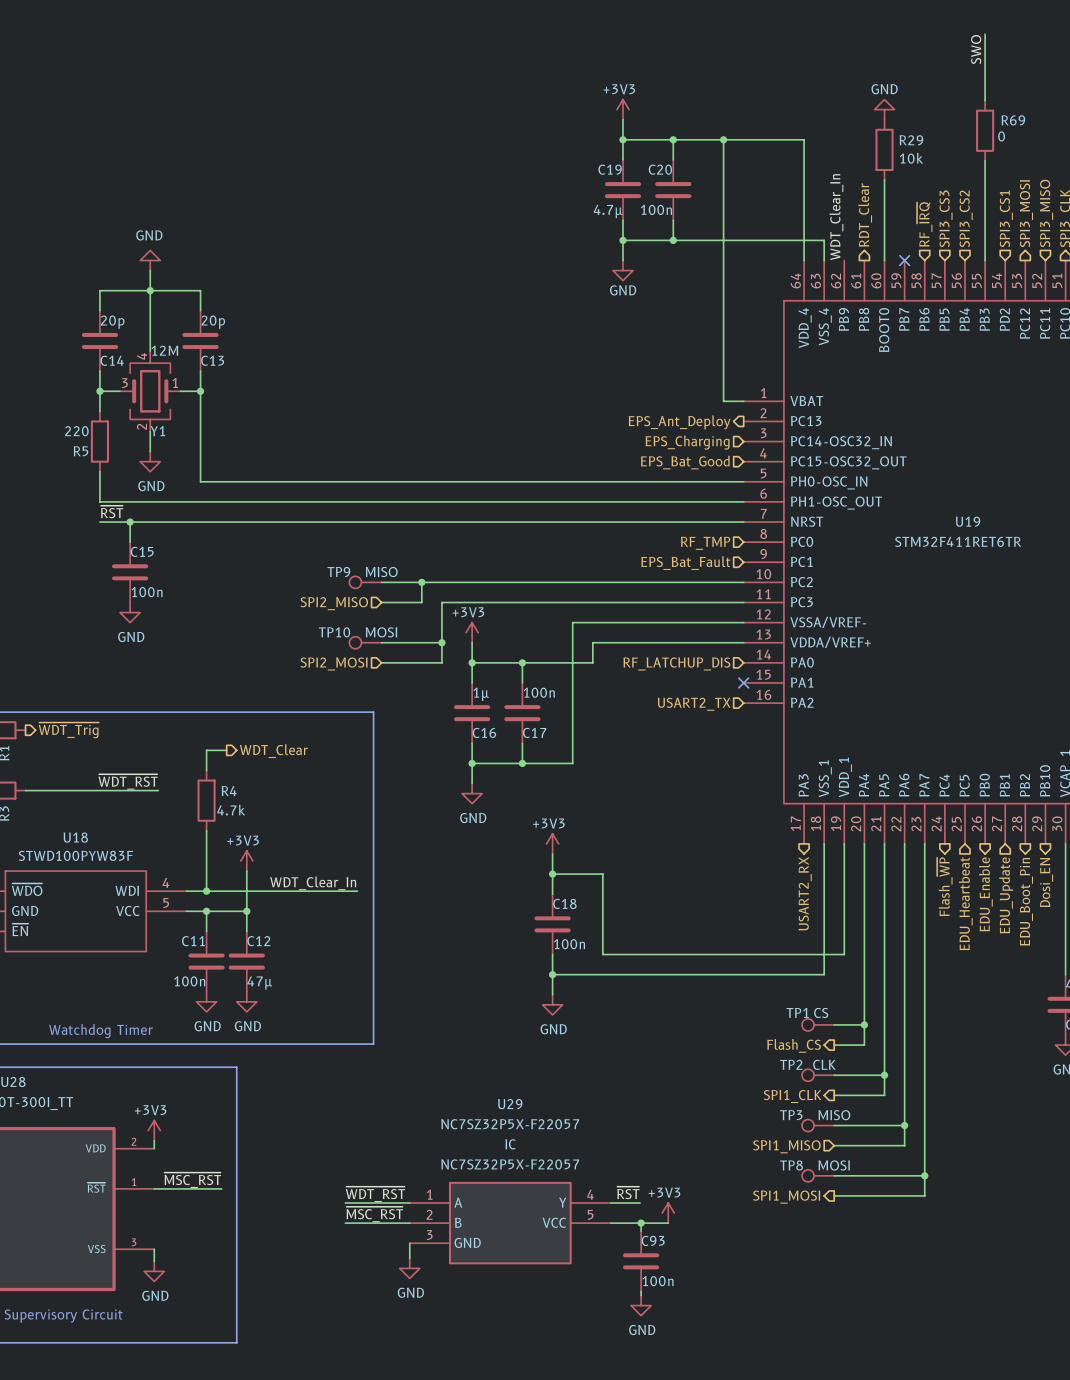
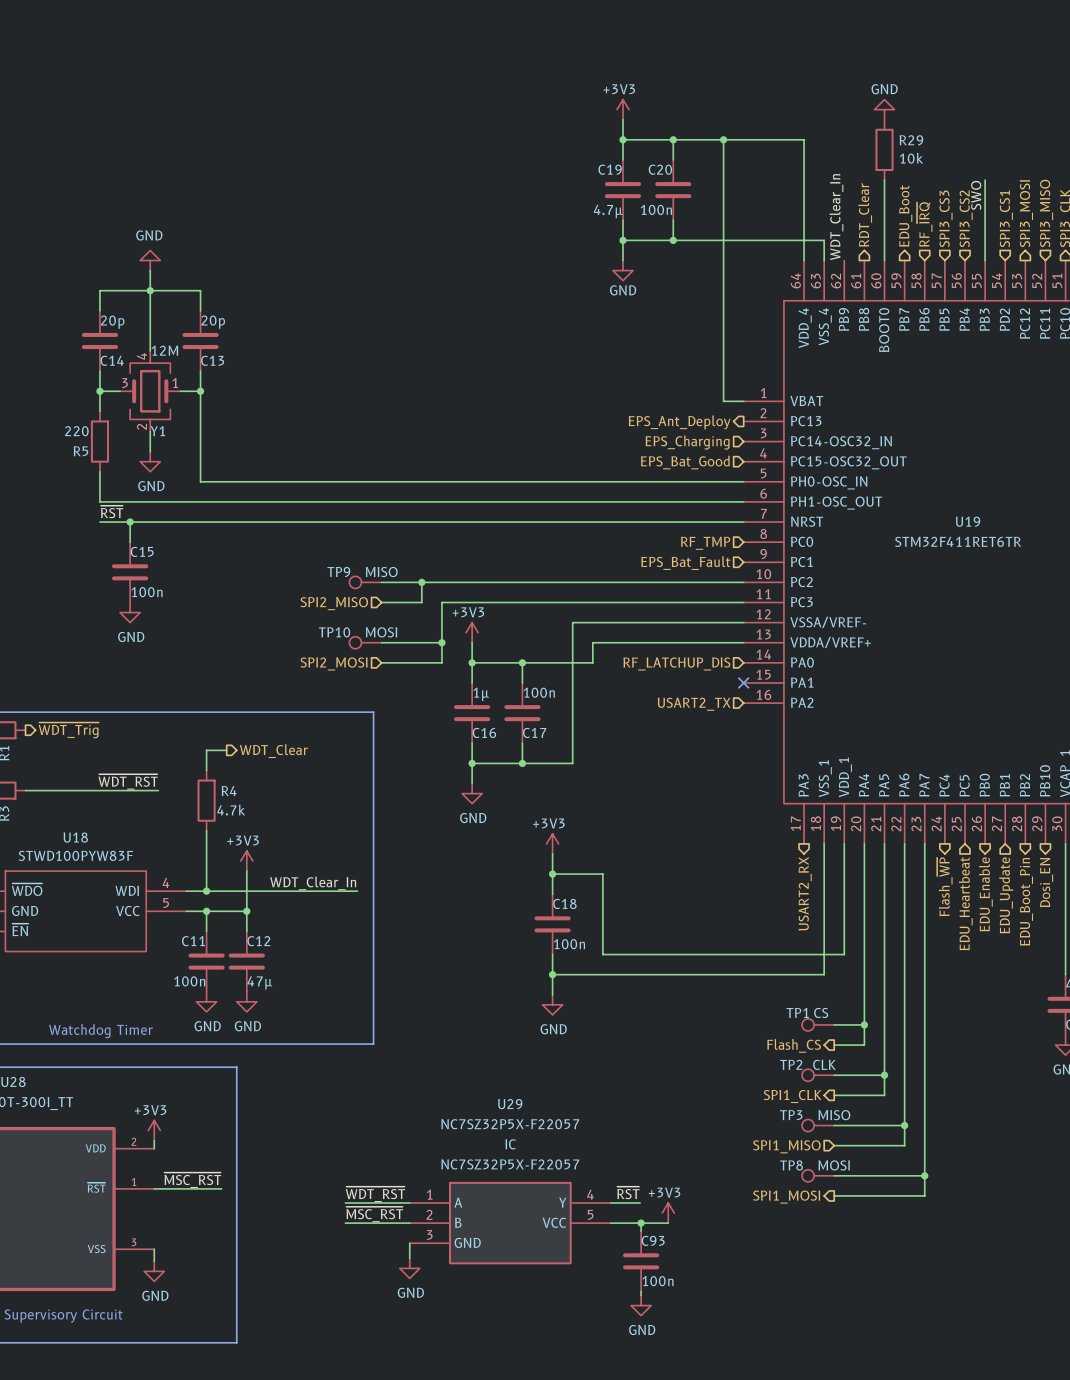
wire: (985, 34) (985, 100) -> none
label position: SWO (976, 49) -> SWO (976, 195)
R69: 0 (985, 130) -> none
wire: (985, 160) (985, 180) -> none
hierarchical label: none -> EDU_Boot (905, 216)
no-connect mark: (904, 260) -> none

